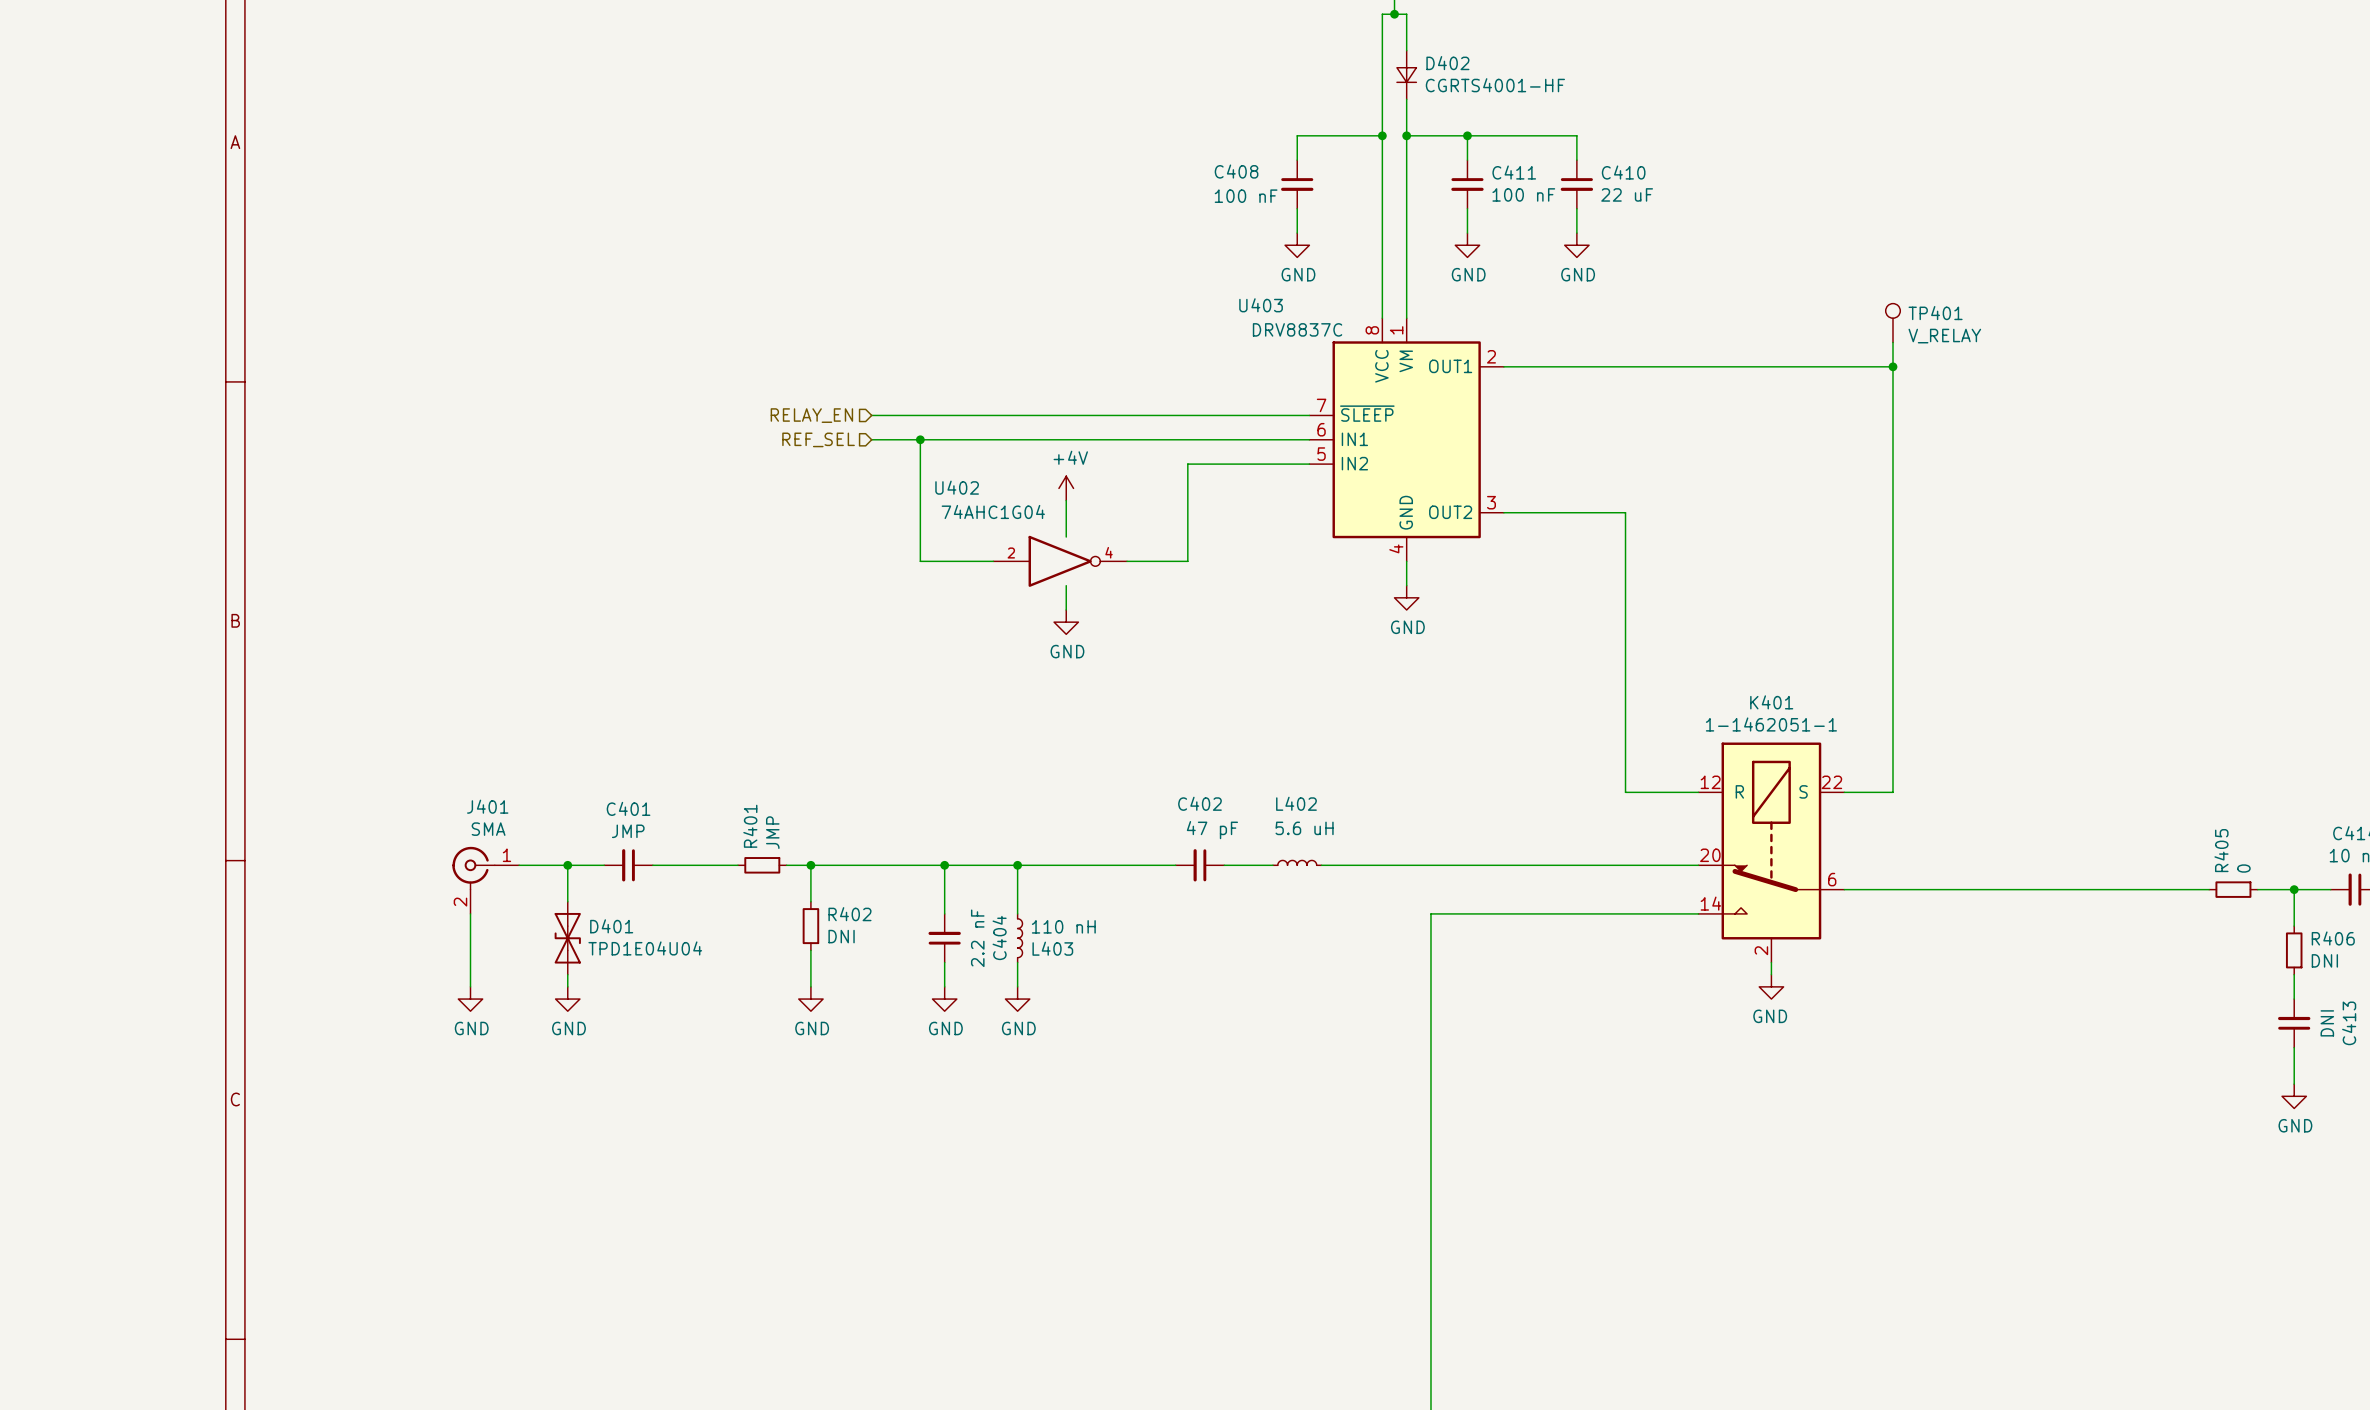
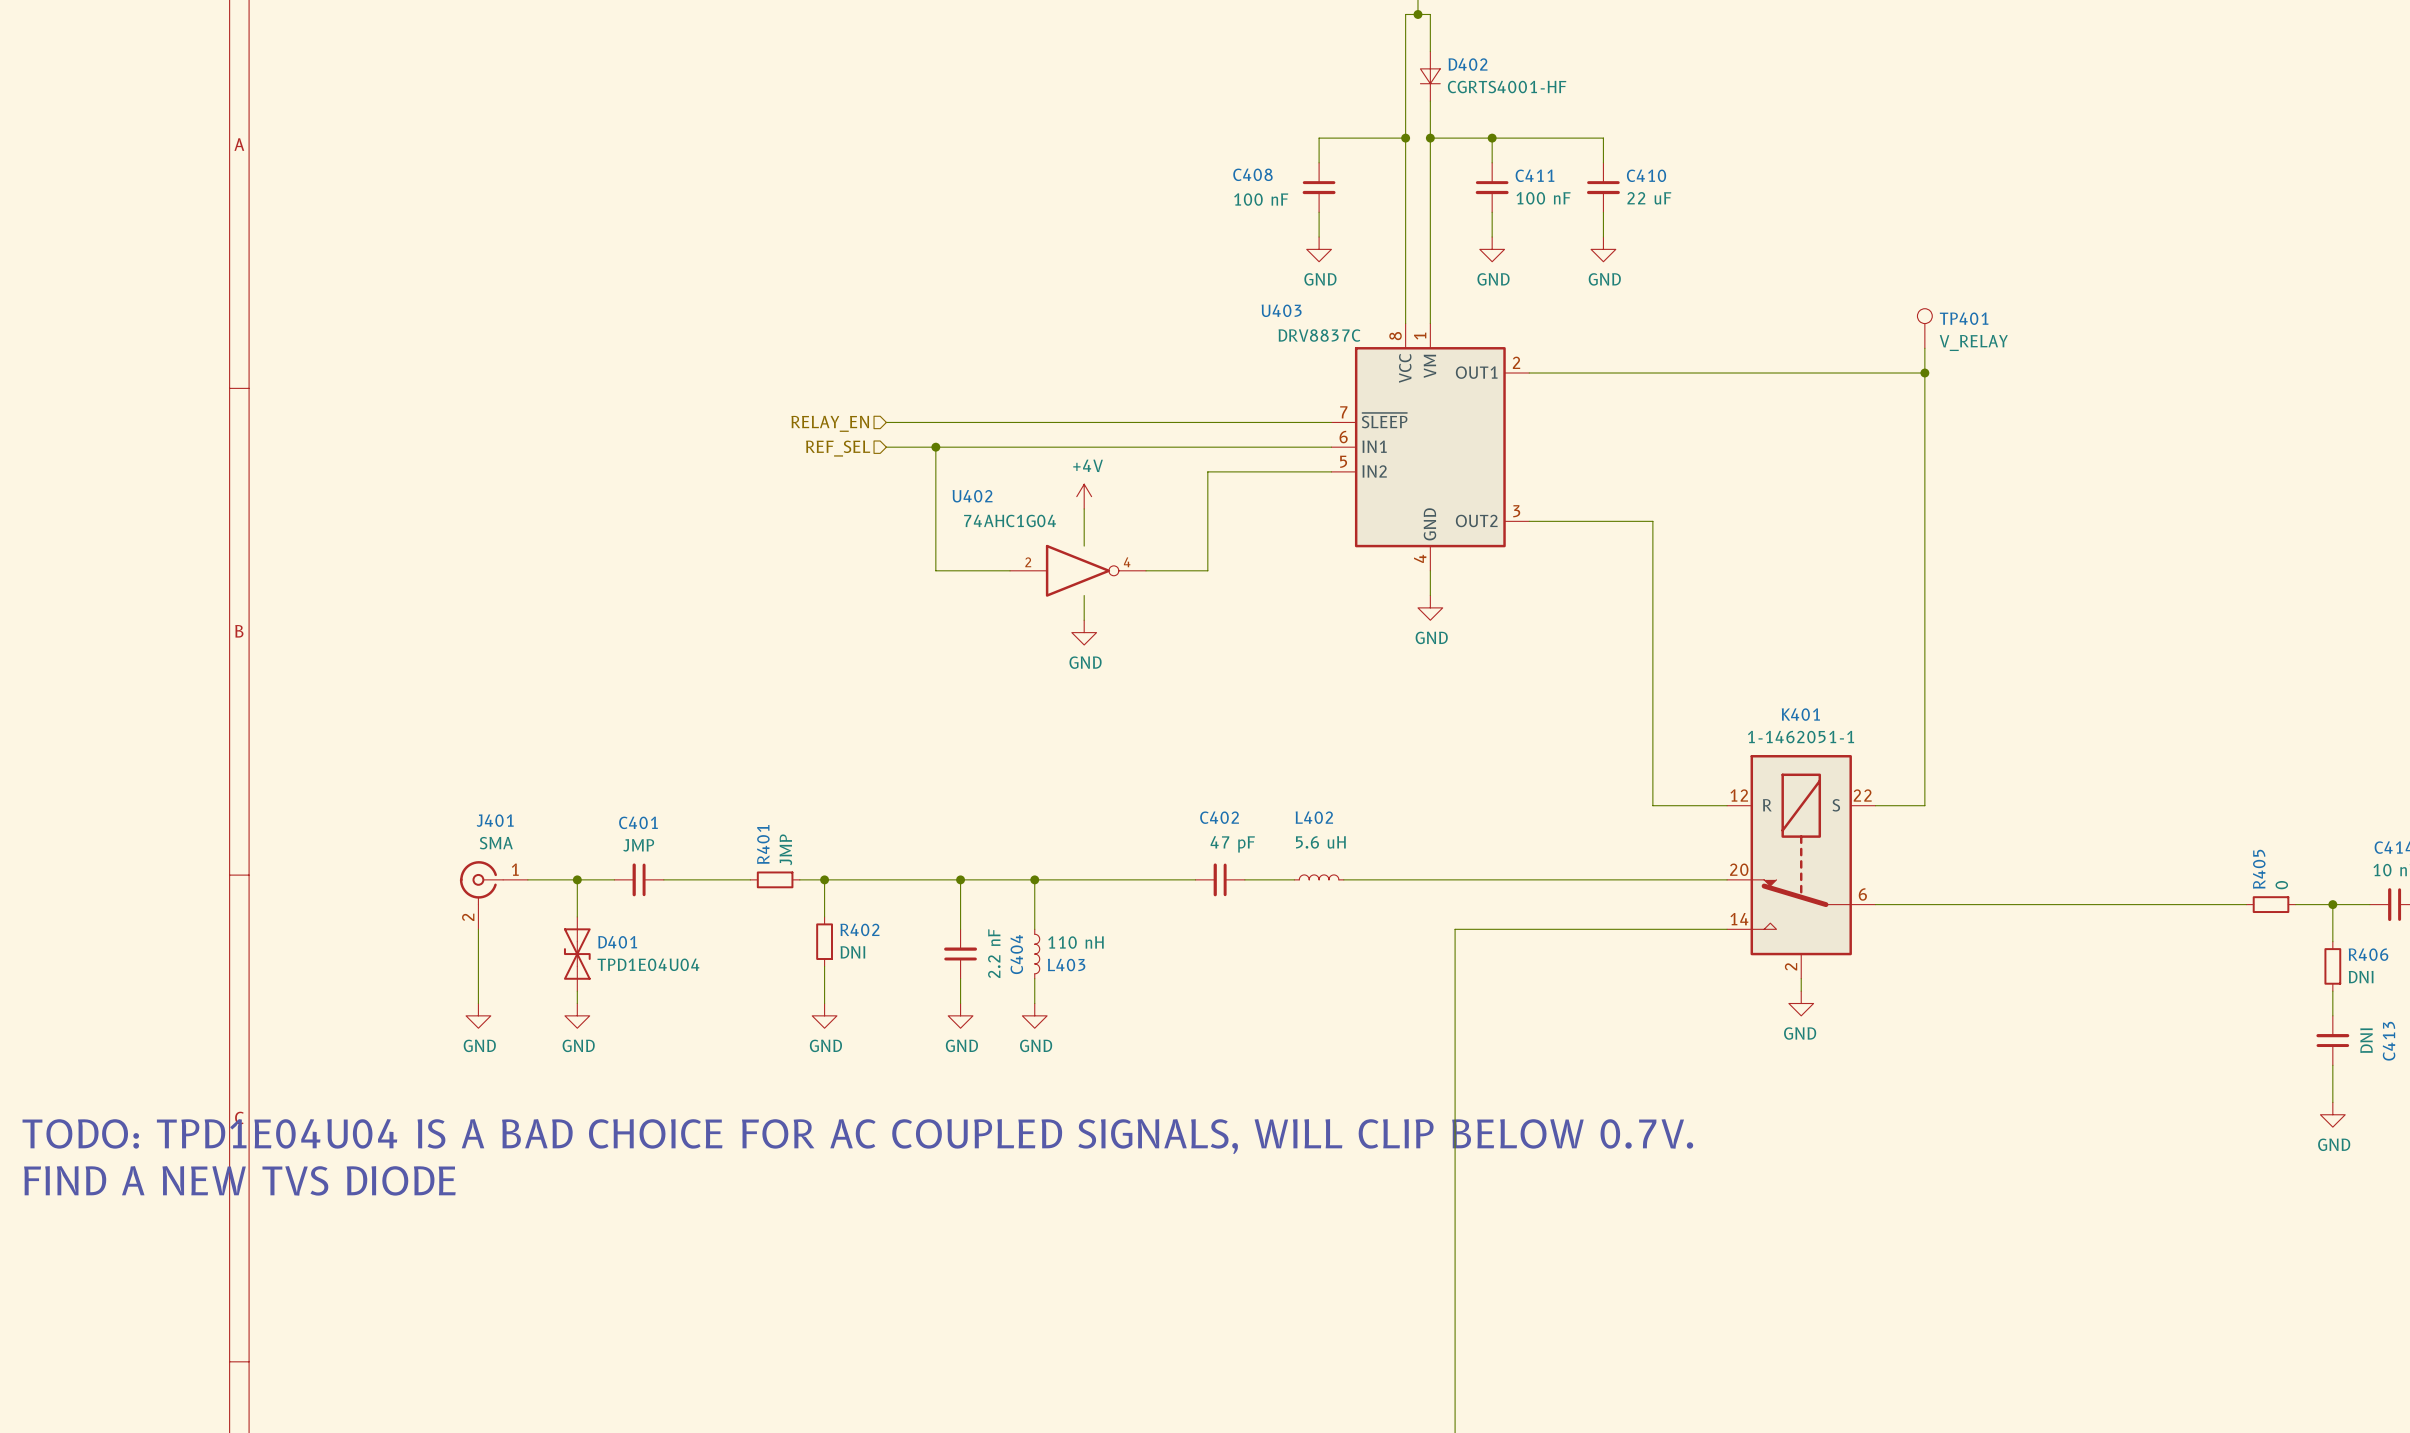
text: none -> TODO: TPD1E04U04 IS A BAD CHOICE FOR AC COUPLED SIGNALS, WILL CLIP BELOW 0.7V. (857, 1136)
text: none -> FIND A NEW TVS DIODE (239, 1180)

